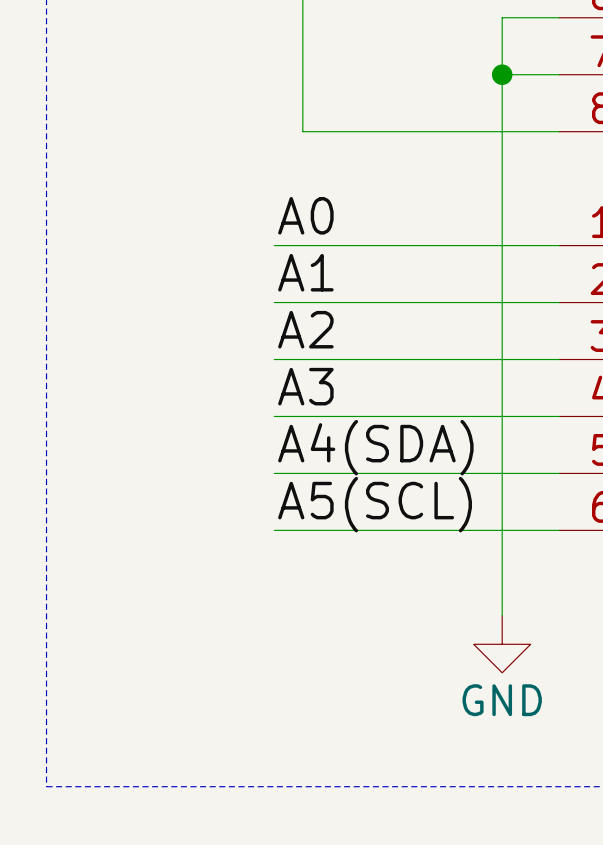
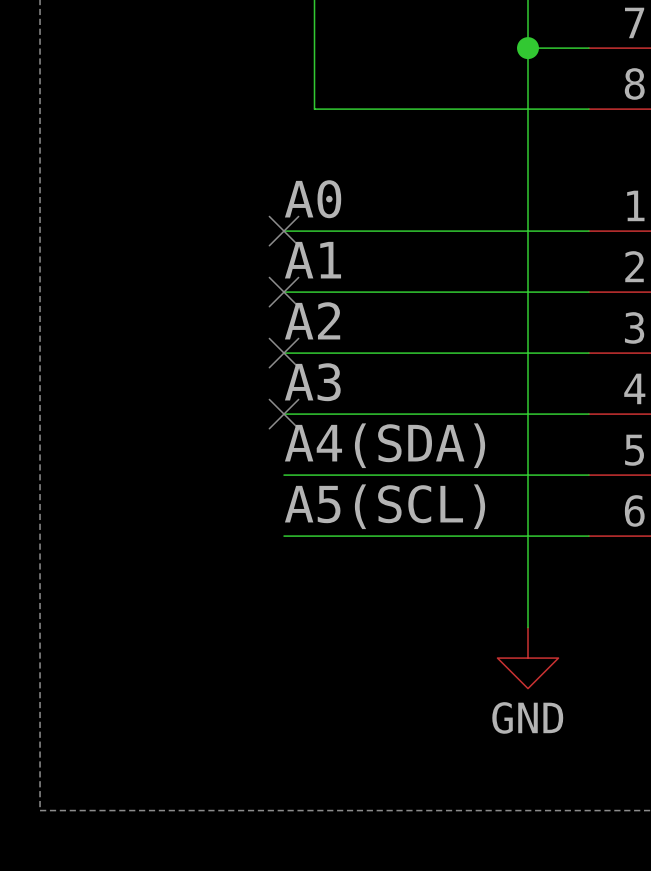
no-connect mark: none -> (284, 231)
no-connect mark: none -> (284, 292)
no-connect mark: none -> (284, 353)
no-connect mark: none -> (284, 414)

